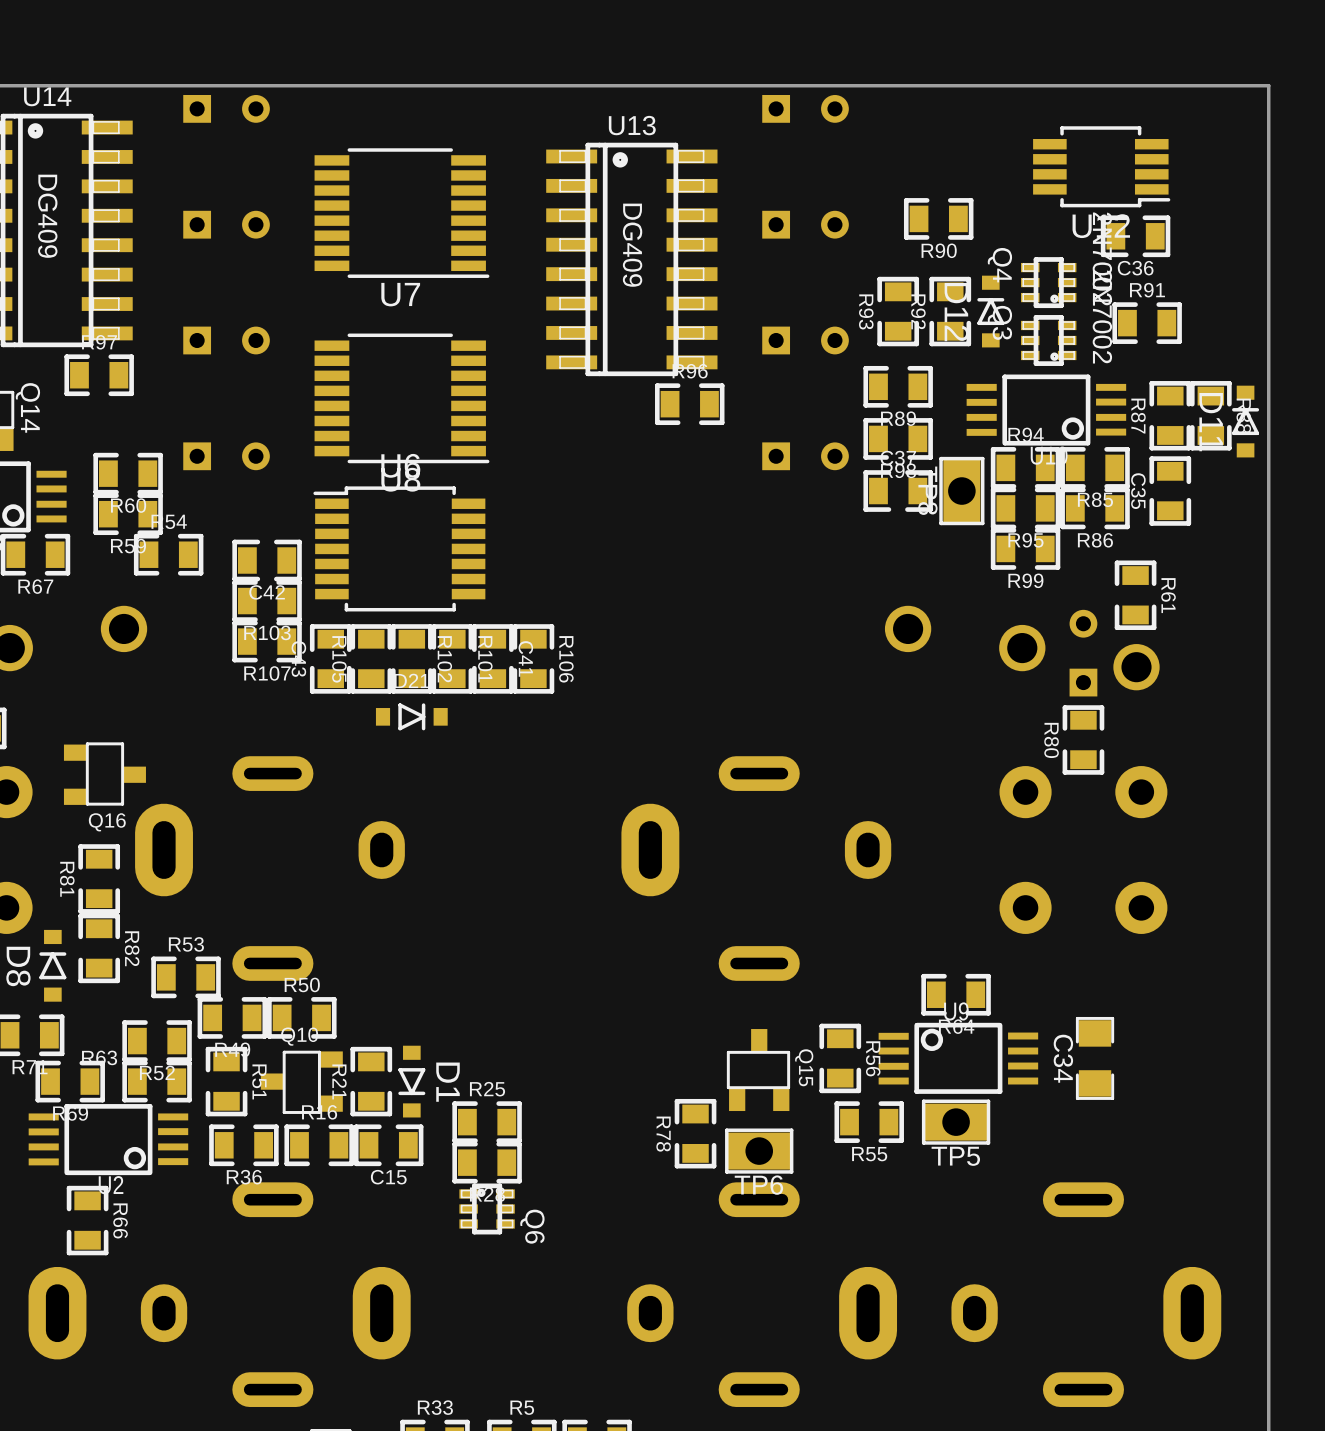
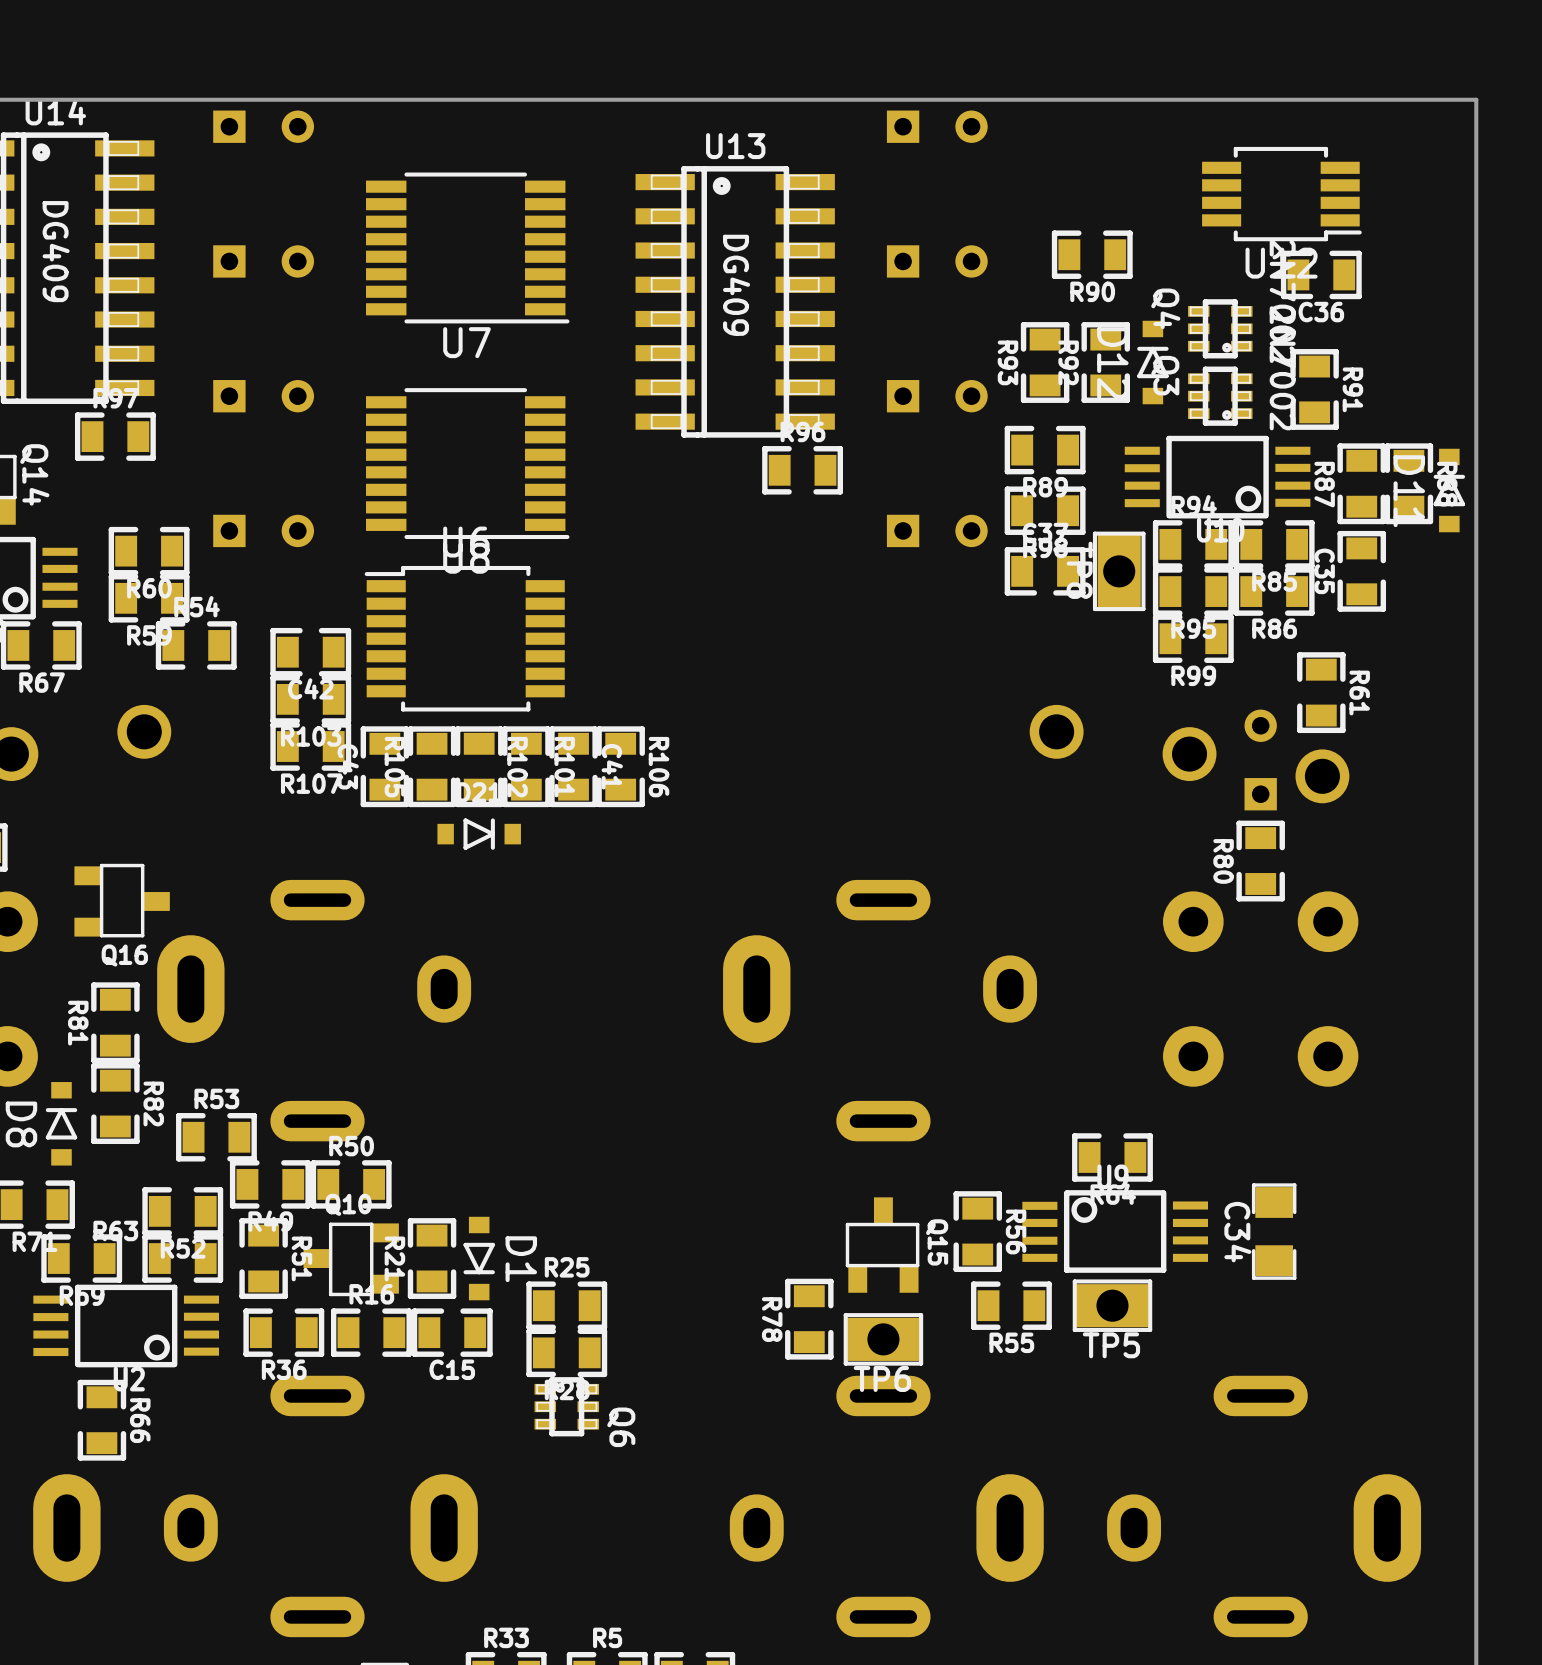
R91 rotation: 0° (1147, 323) -> 90° clockwise (1314, 389)

